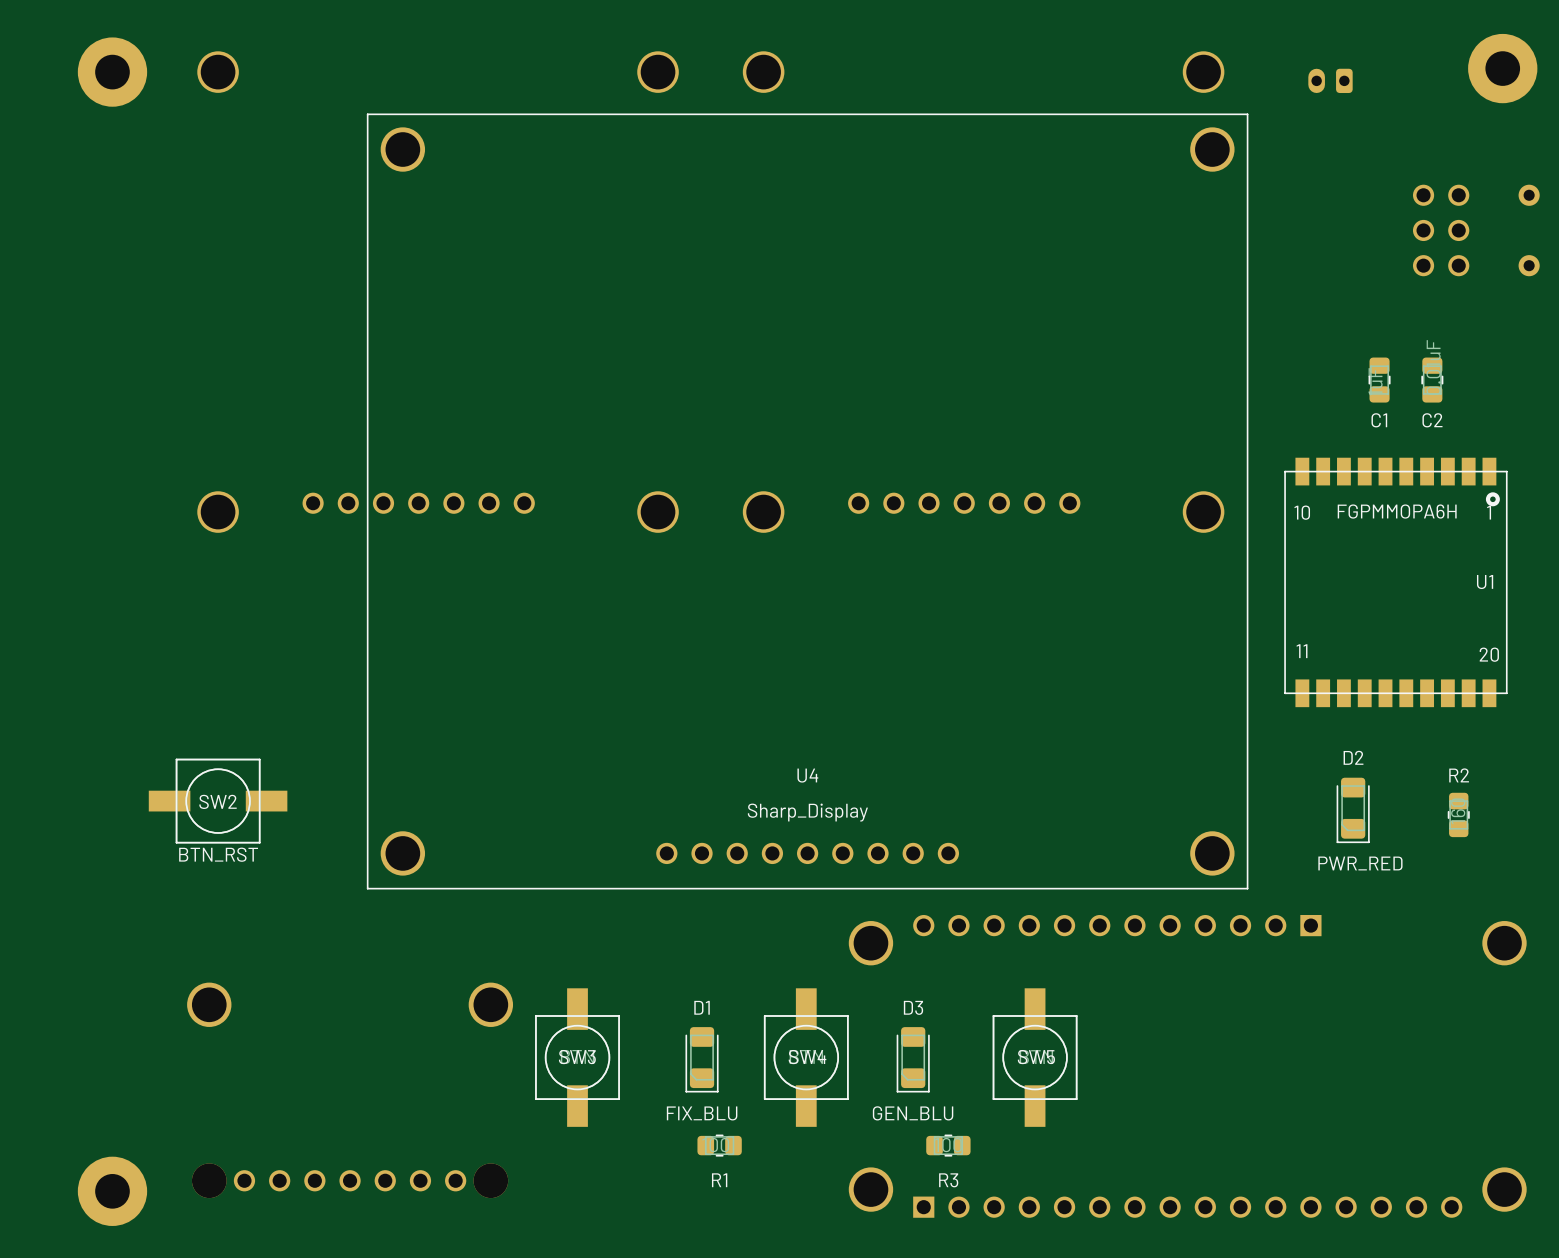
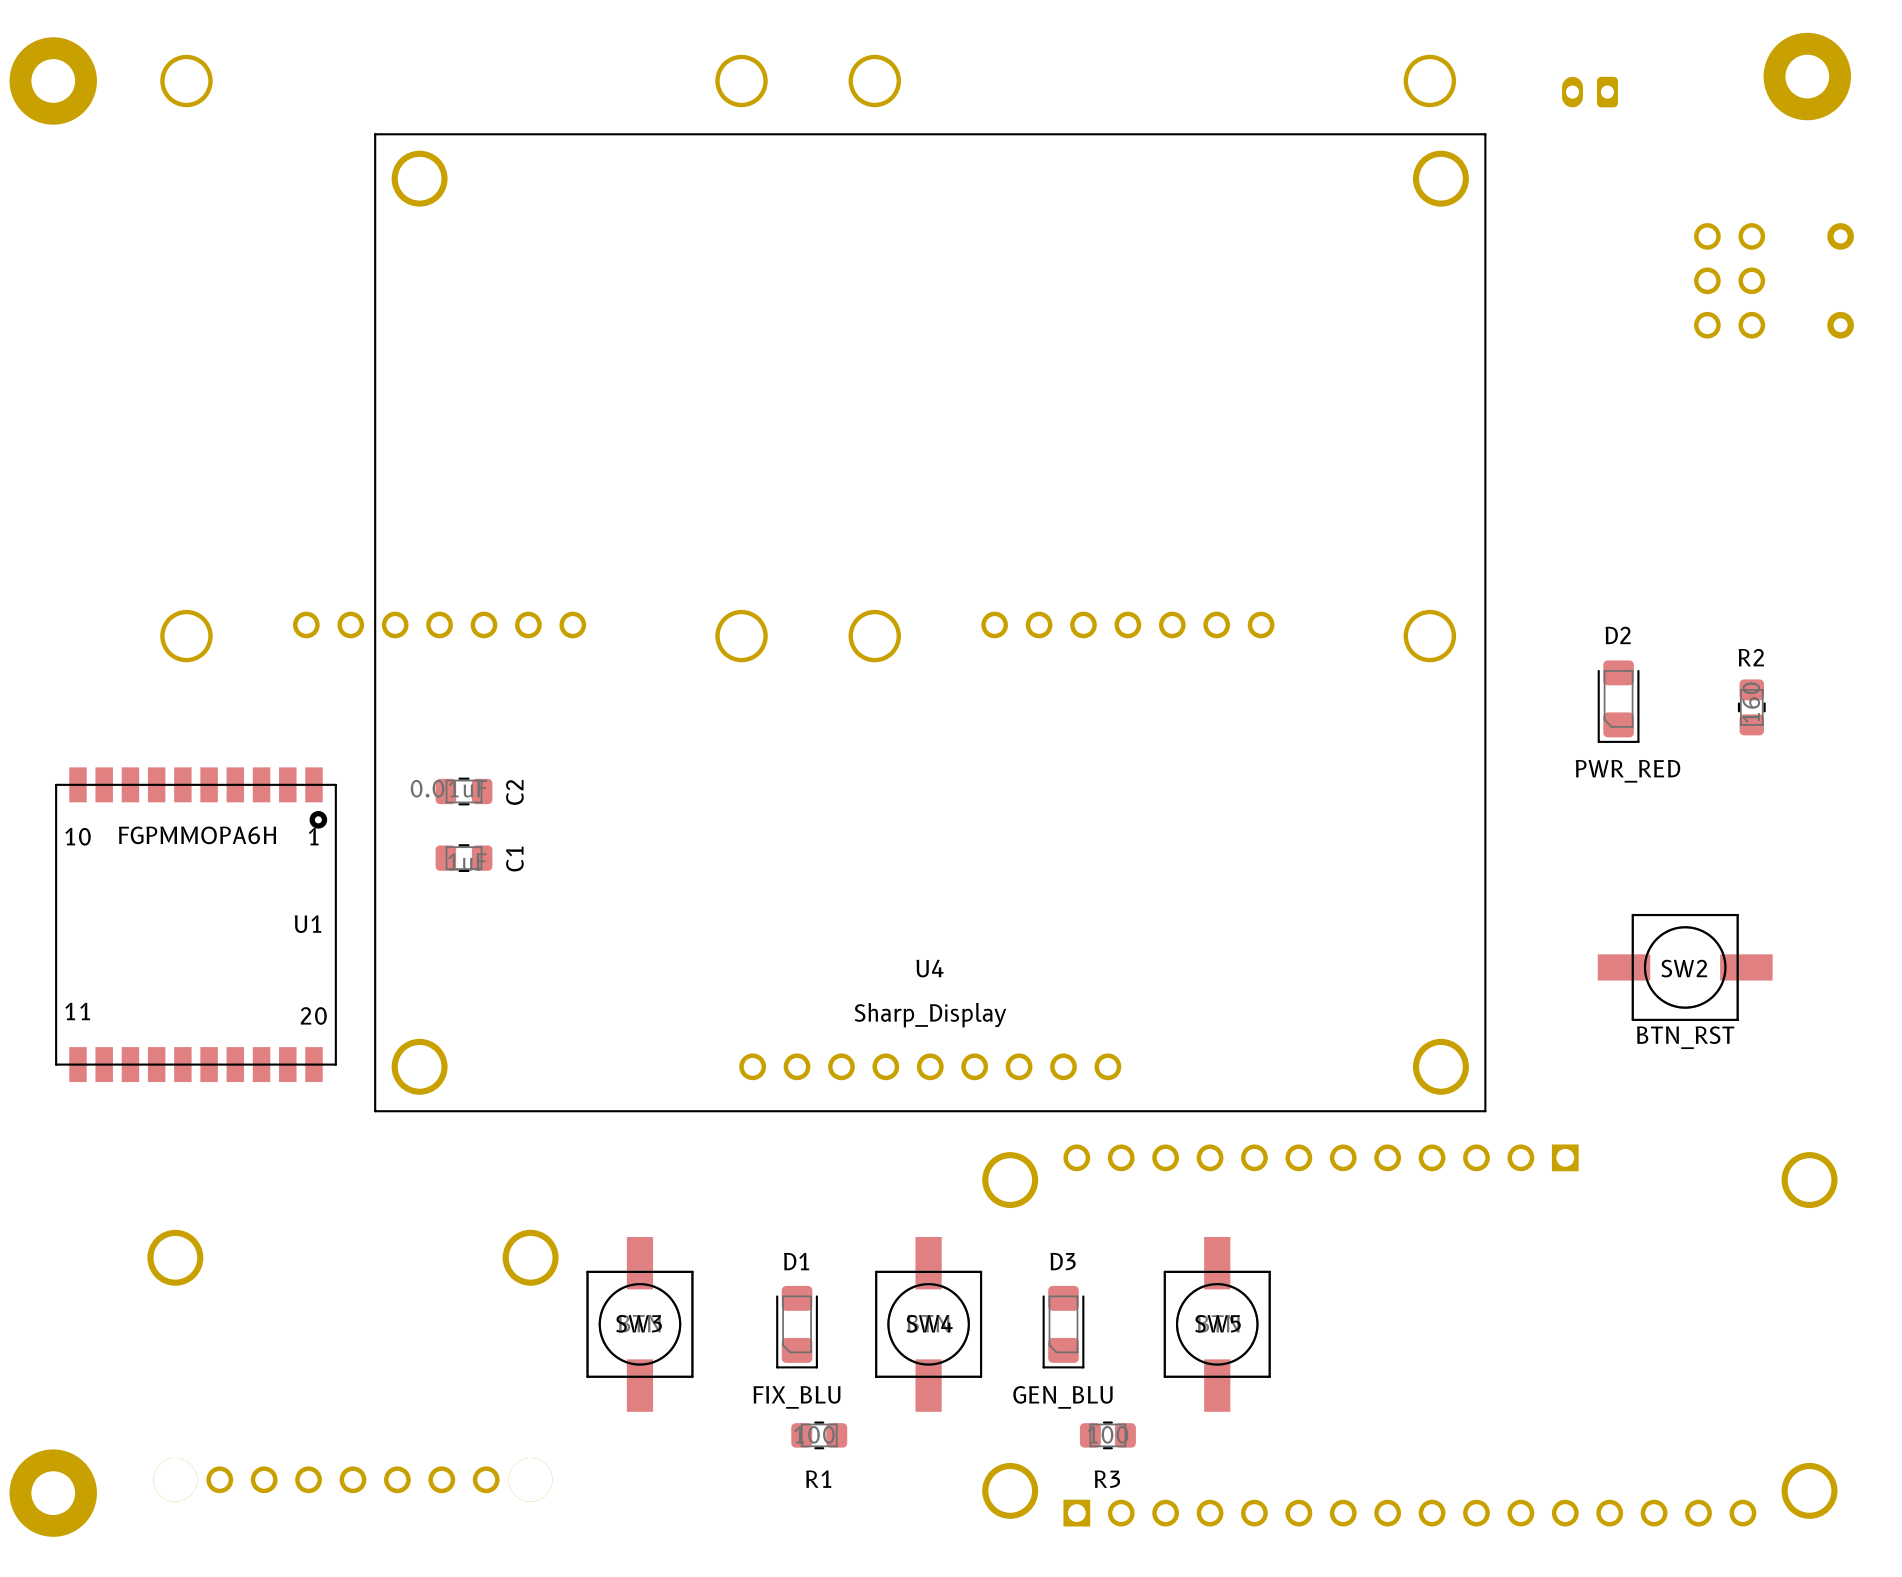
C1 rotation: 0° (1379, 380) -> 90° clockwise (464, 858)
C1 position: (1379, 380) -> (464, 858)
C2 rotation: 0° (1432, 380) -> 90° clockwise (464, 791)
C2 position: (1432, 380) -> (464, 791)
C1 name position: C1 (1379, 420) -> C1 (514, 859)
C2 name position: C2 (1432, 420) -> C2 (514, 792)
U1 position: (1395, 582) -> (195, 924)
SW2 position: (218, 801) -> (1685, 967)
D2 position: (1353, 810) -> (1618, 701)
R2 position: (1458, 814) -> (1751, 707)

